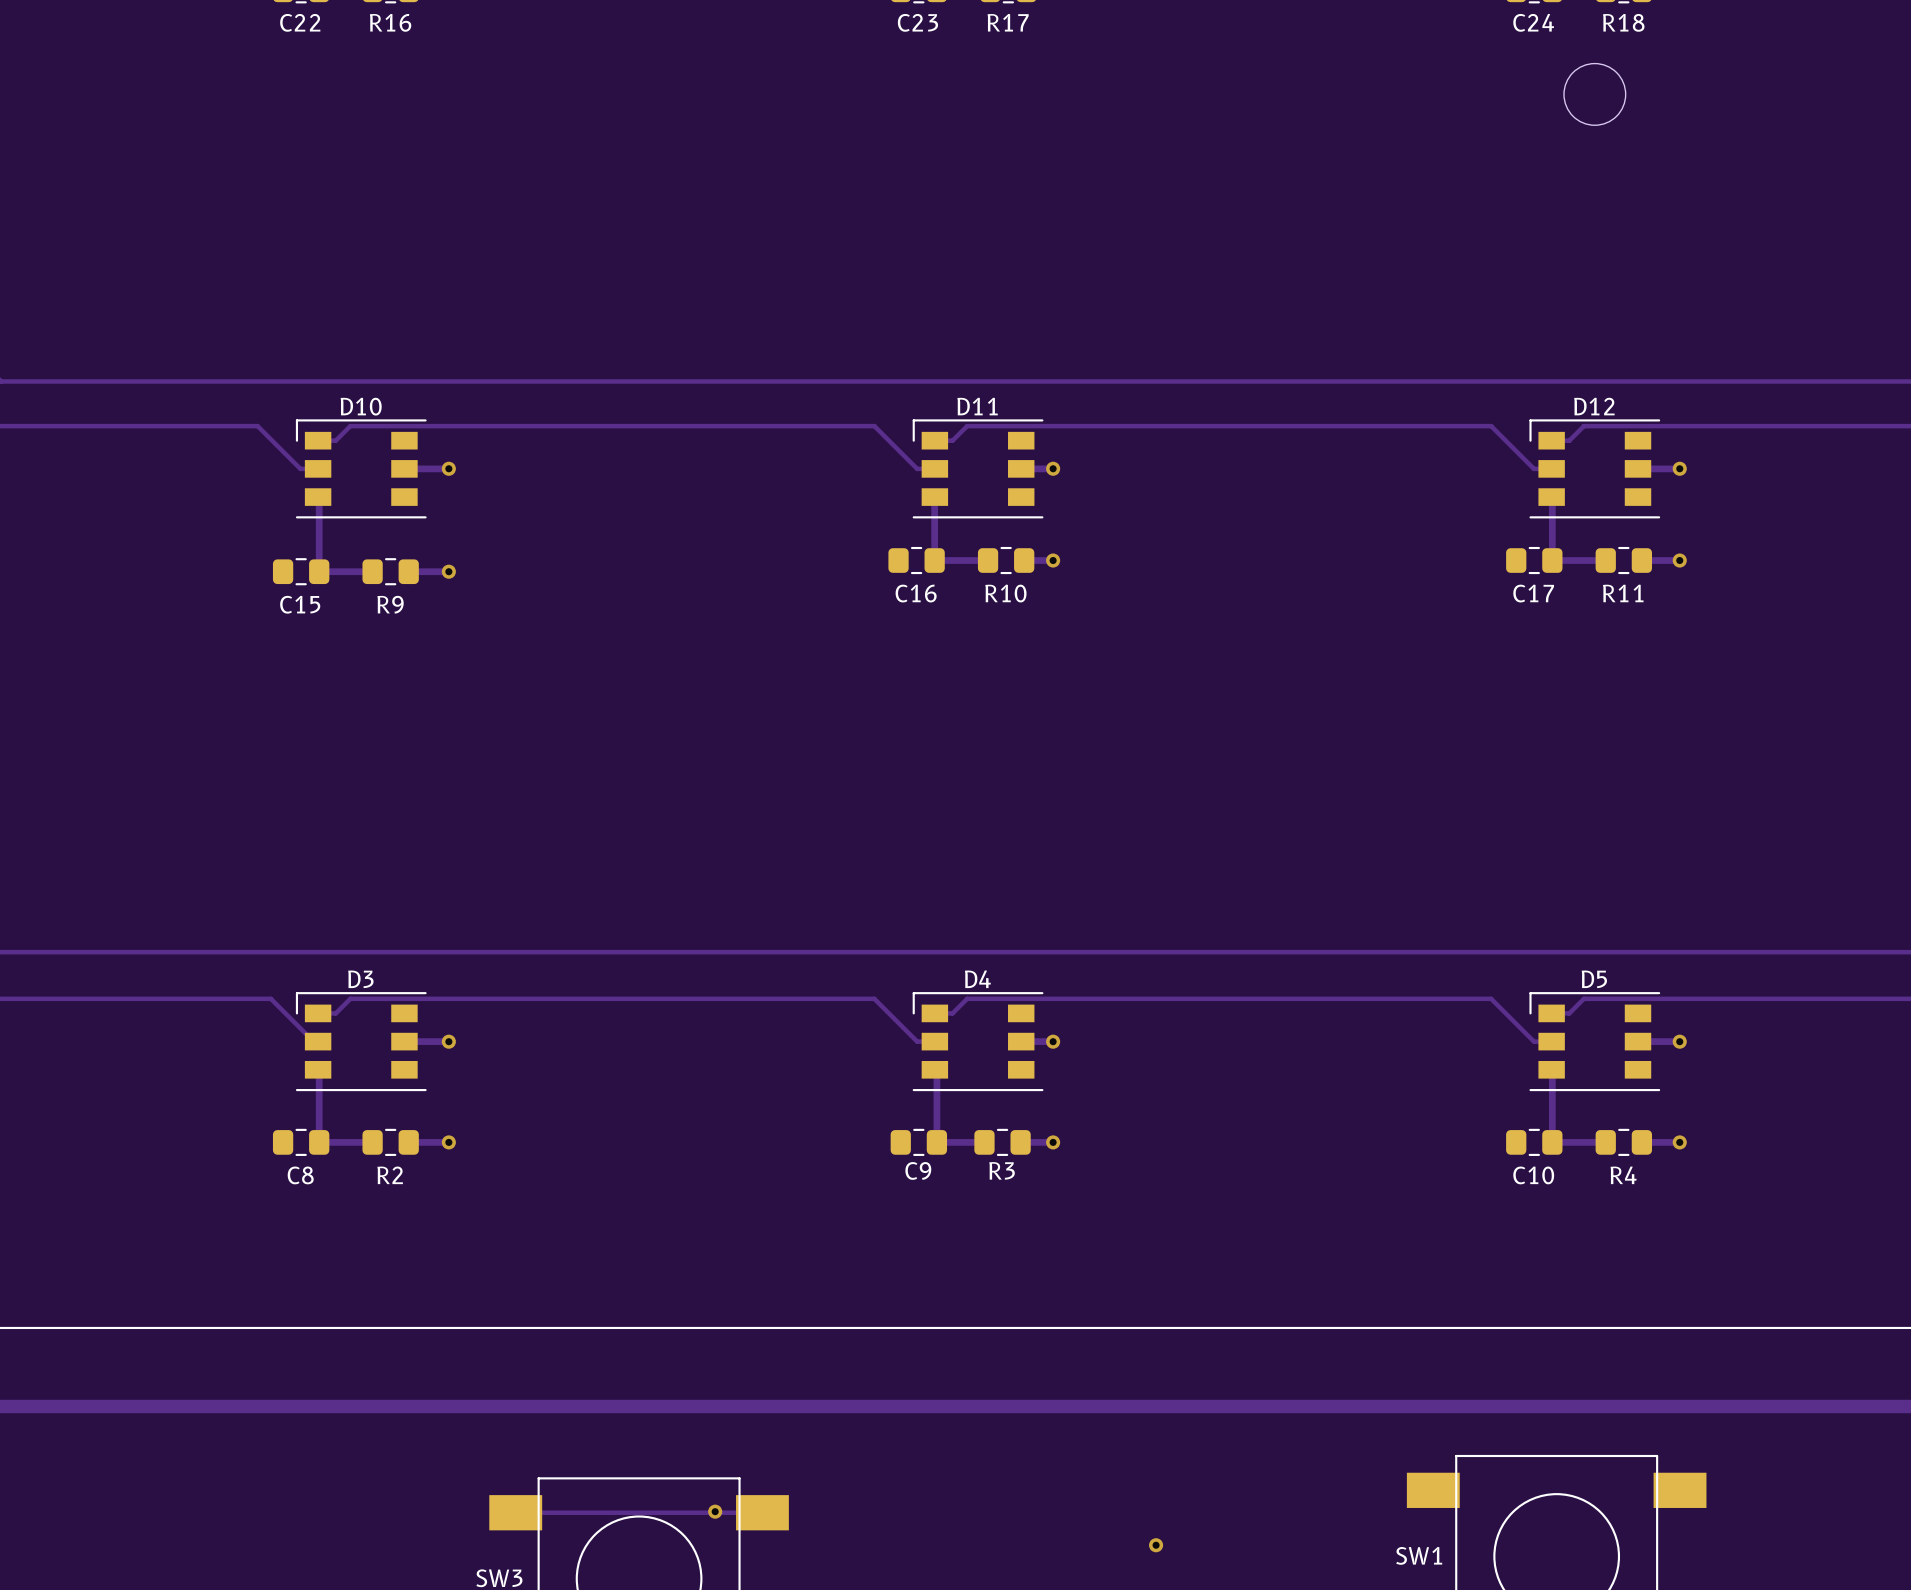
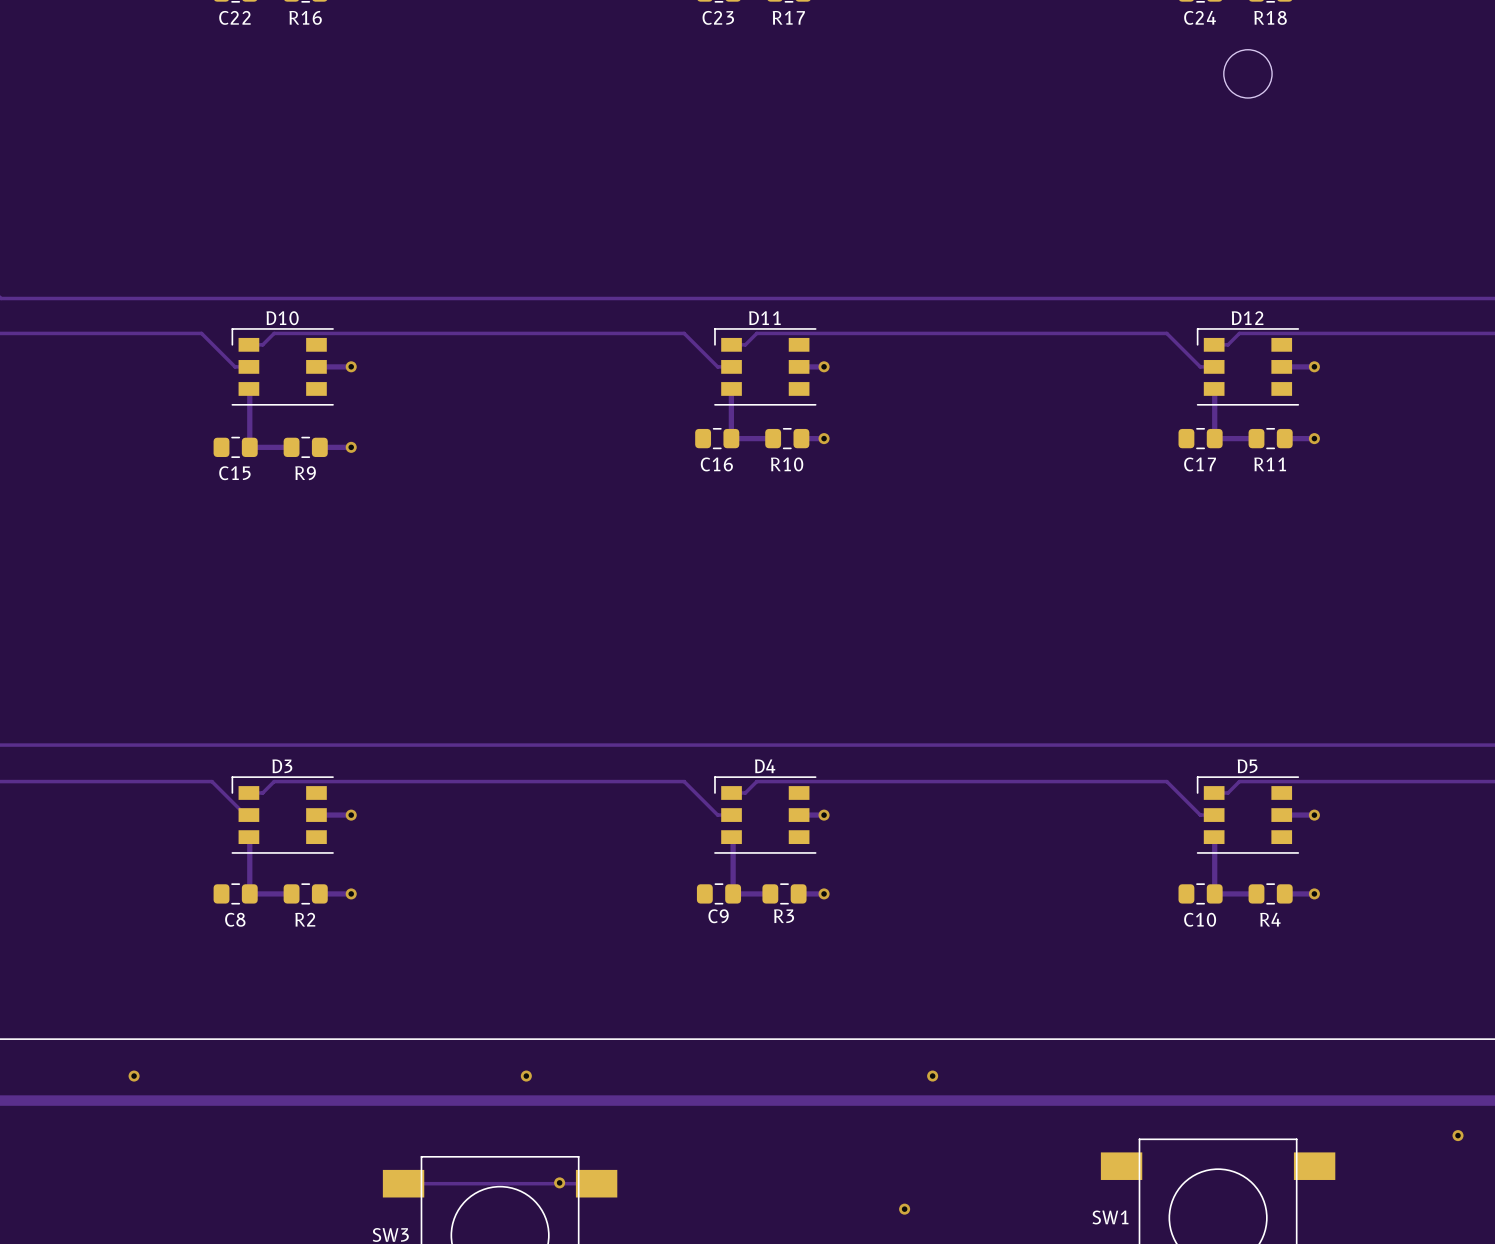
via: none -> (134, 1076)
via: none -> (526, 1076)
via: none -> (932, 1076)
via: none -> (1458, 1135)

